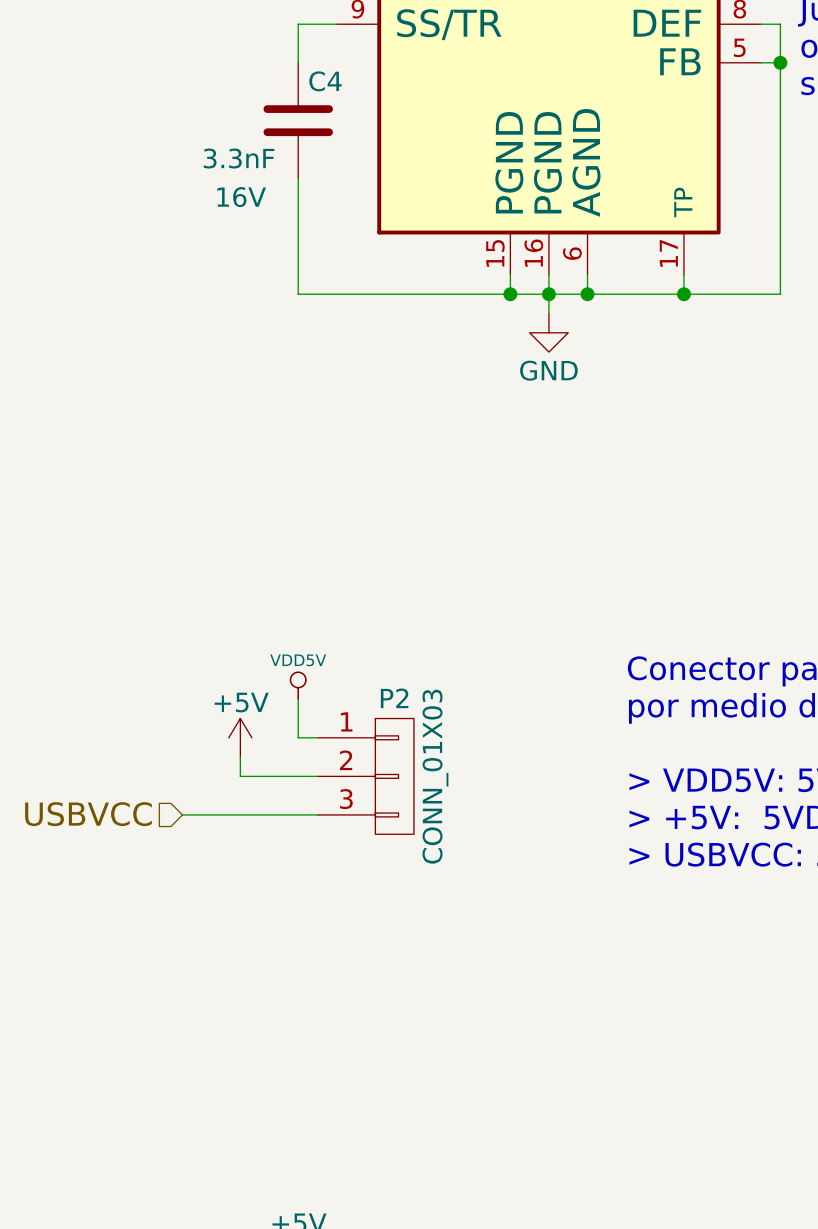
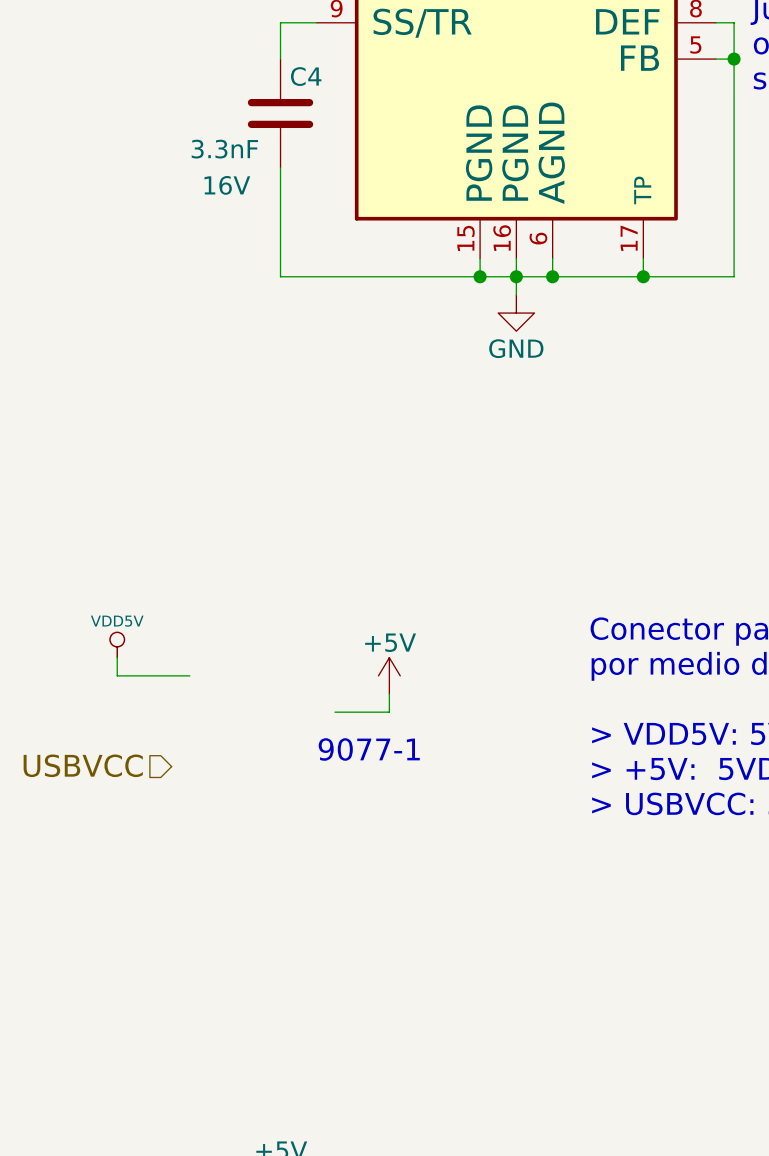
power symbol position: VDD5V (298, 685) -> VDD5V (117, 645)
wire: (298, 699) (298, 737) (317, 737) -> none
power symbol position: +5V (240, 737) -> +5V (389, 675)
wire: none -> (389, 694) (389, 712) (334, 712)
wire: (240, 757) (240, 776) (317, 776) -> (117, 657) (117, 675) (189, 675)
P2: CONN_01X03 (365, 776) -> none
text: none -> 9077-1 (369, 749)
wire: (182, 814) (317, 814) -> none

